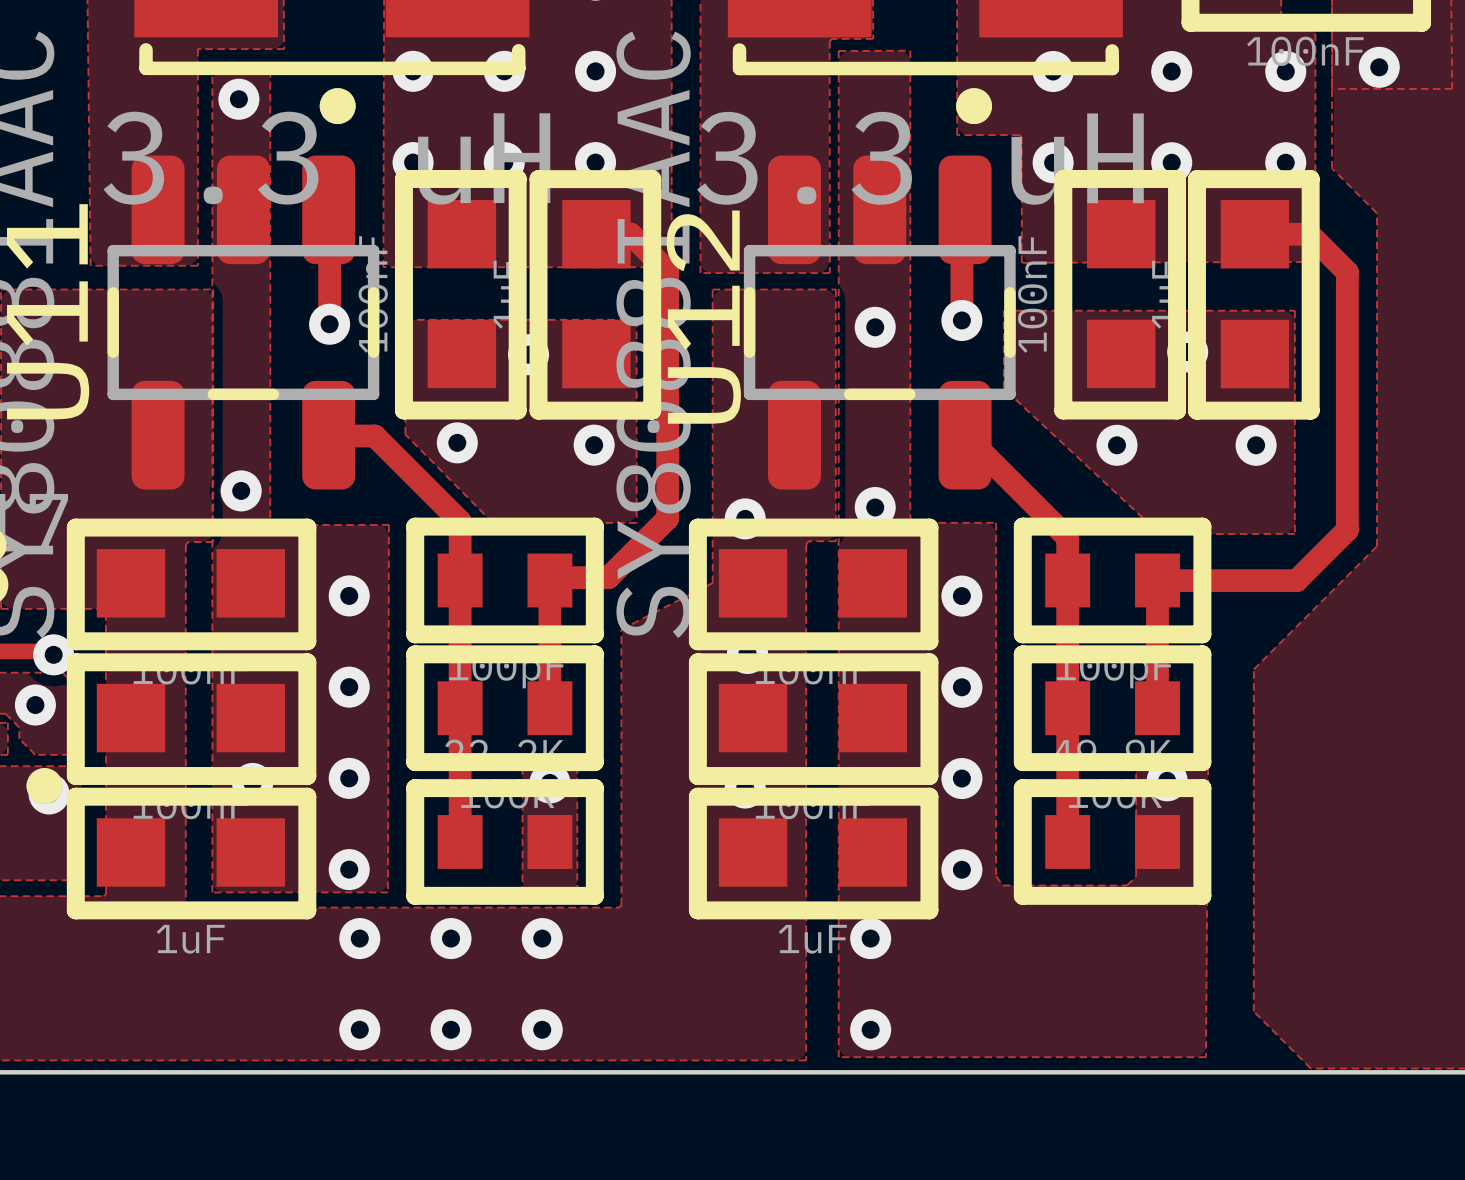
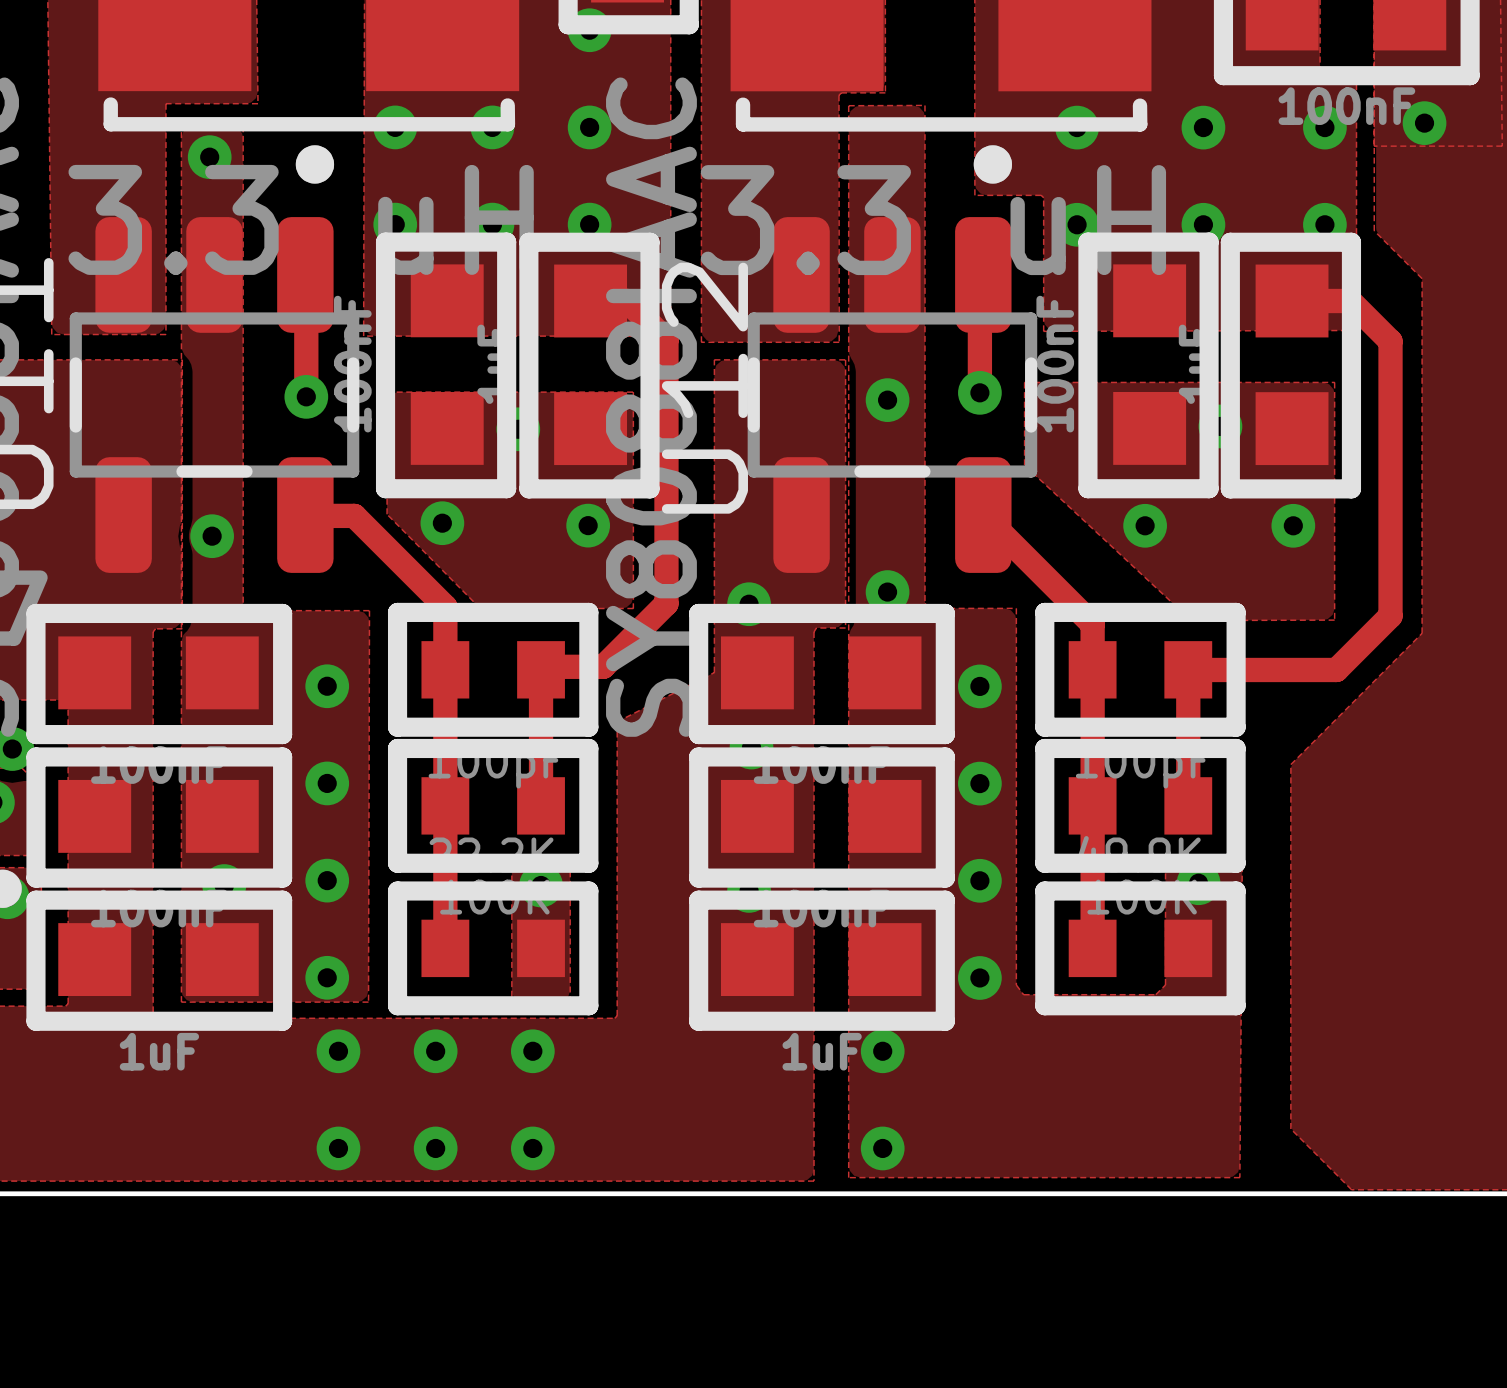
via position: (241, 490) -> (212, 536)

